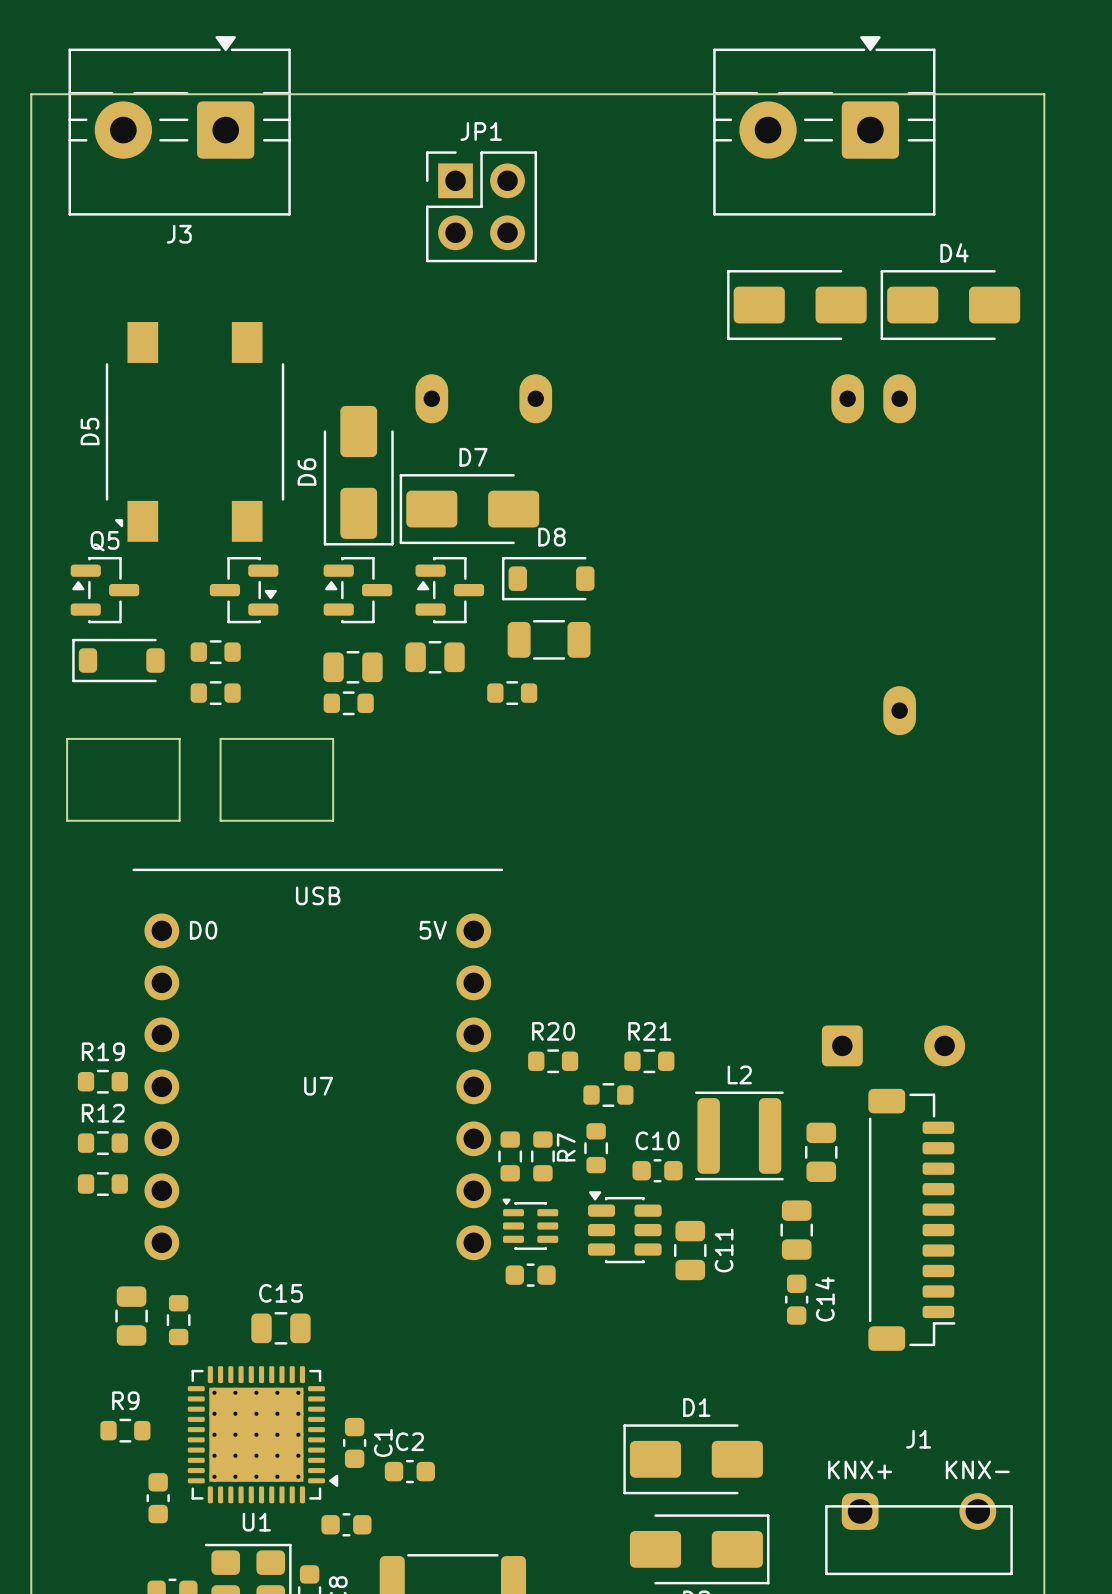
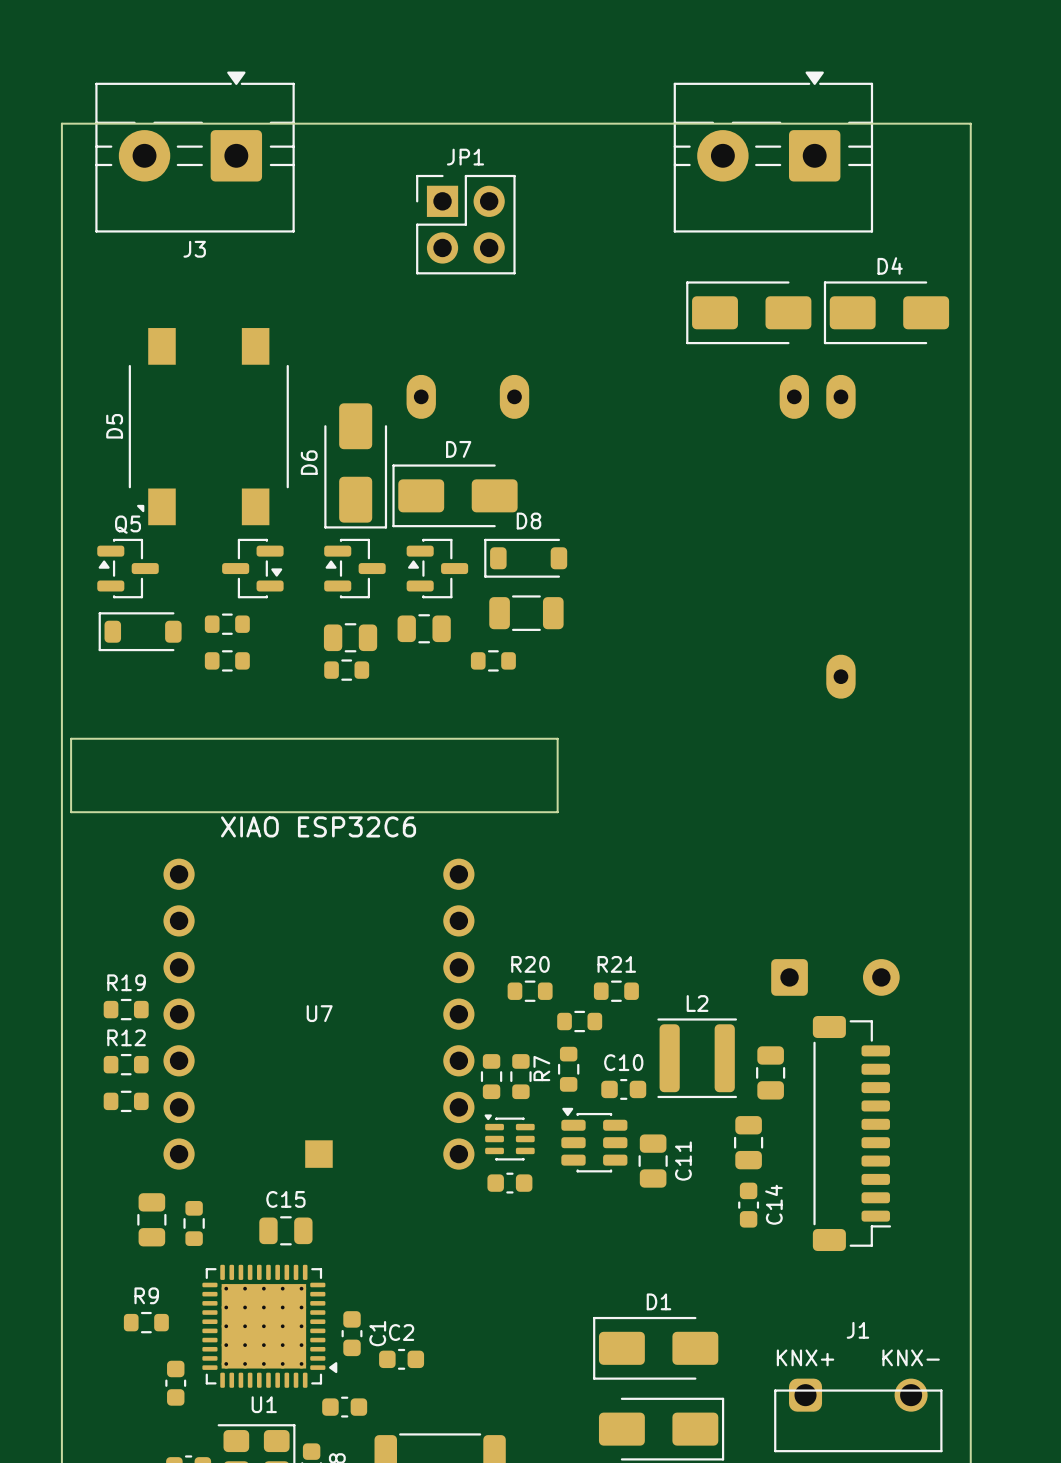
board edge: (67, 738) (67, 820) (179, 820) (179, 738) (67, 738) -> none
board edge: (220, 738) (333, 738) (333, 820) (220, 820) (220, 738) -> none
board edge: none -> (71, 738) (71, 812) (557, 812) (557, 738) (71, 738)
U7 footprint: [132, 868, 504, 1261] -> [163, 858, 475, 1170]

